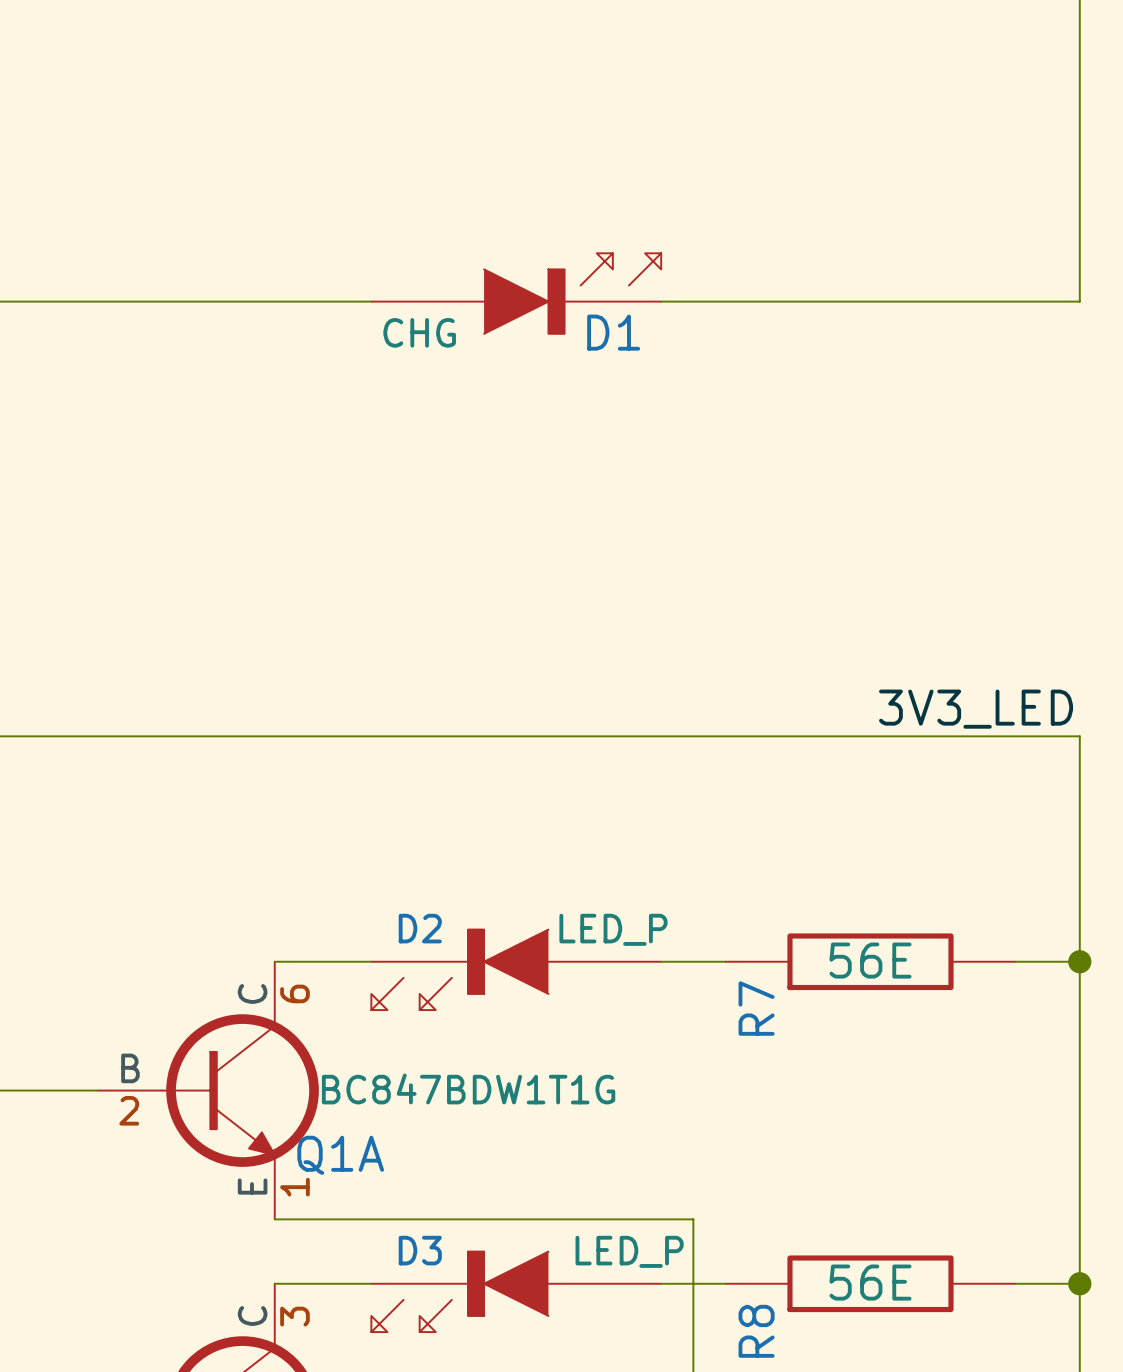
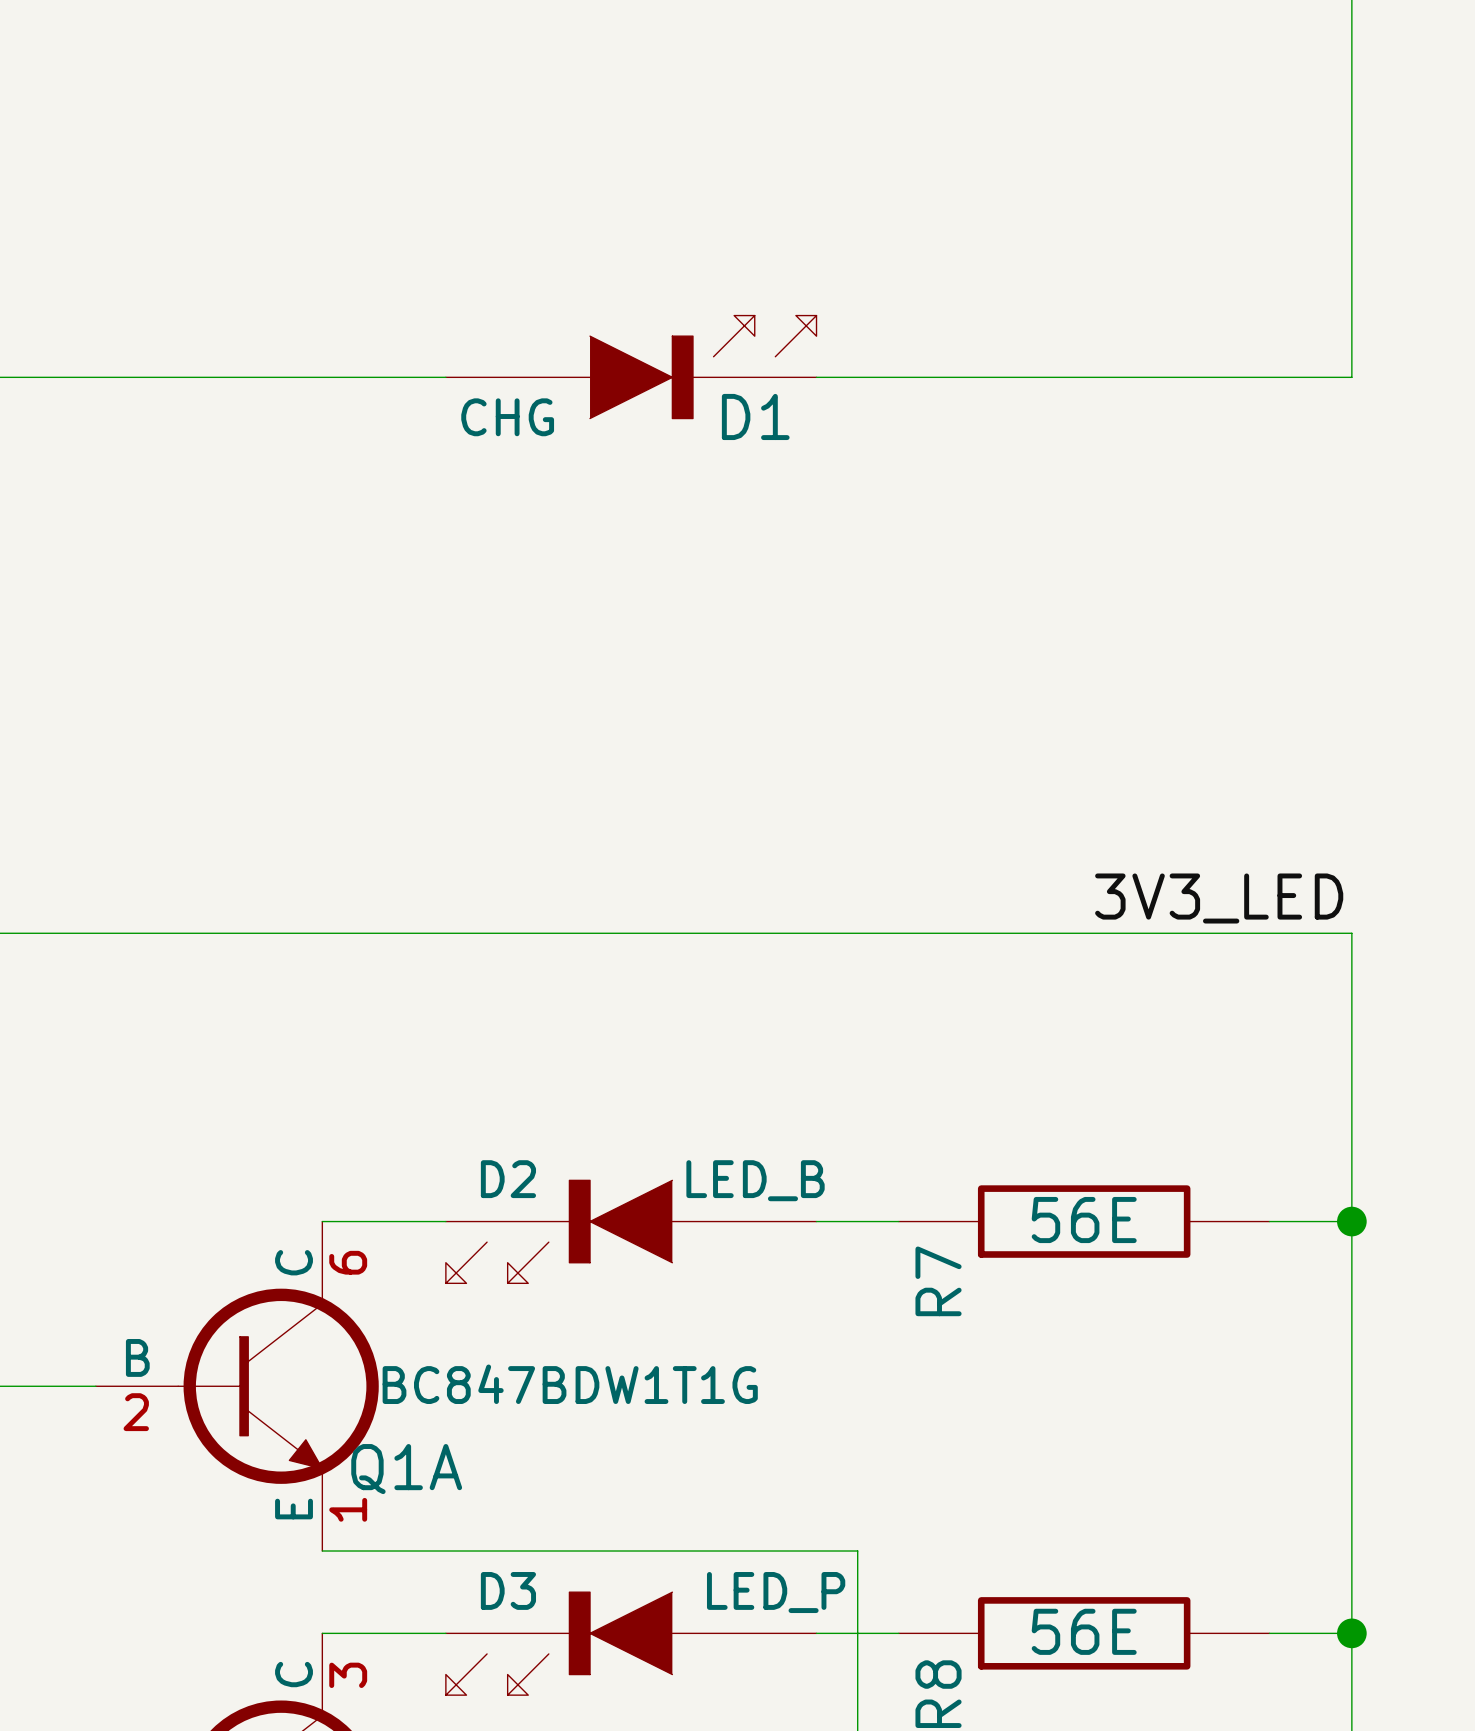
D2 value: LED_P (613, 929) -> LED_B (755, 1180)

